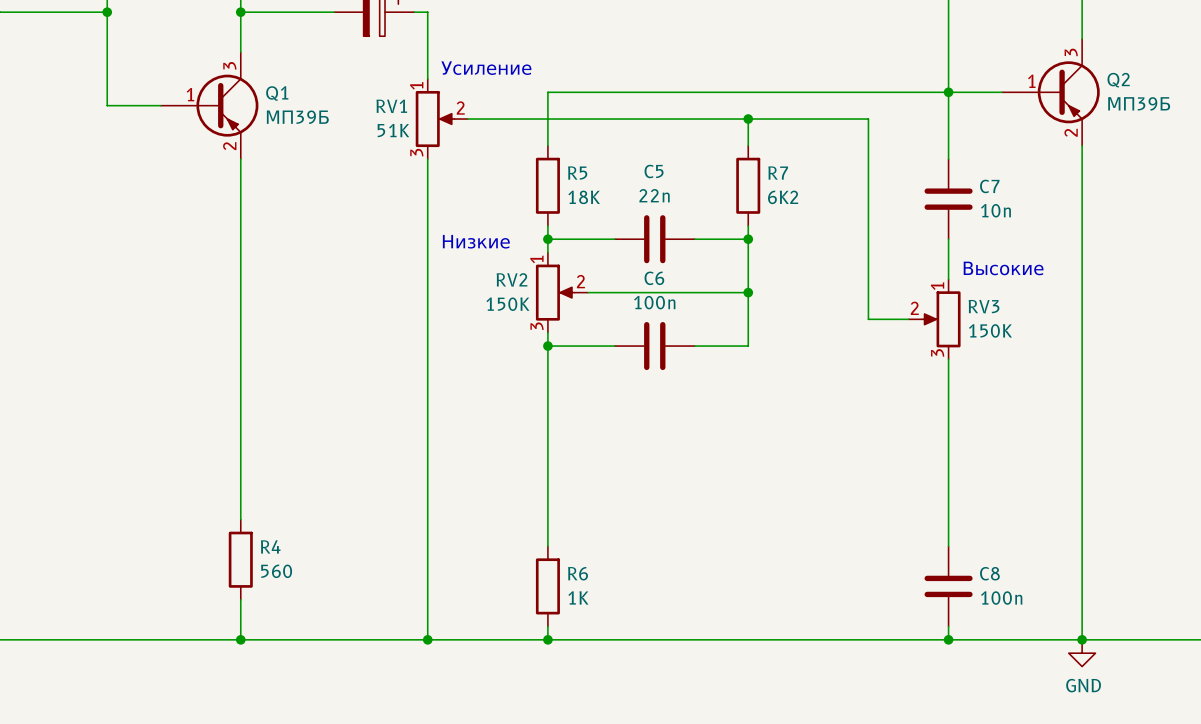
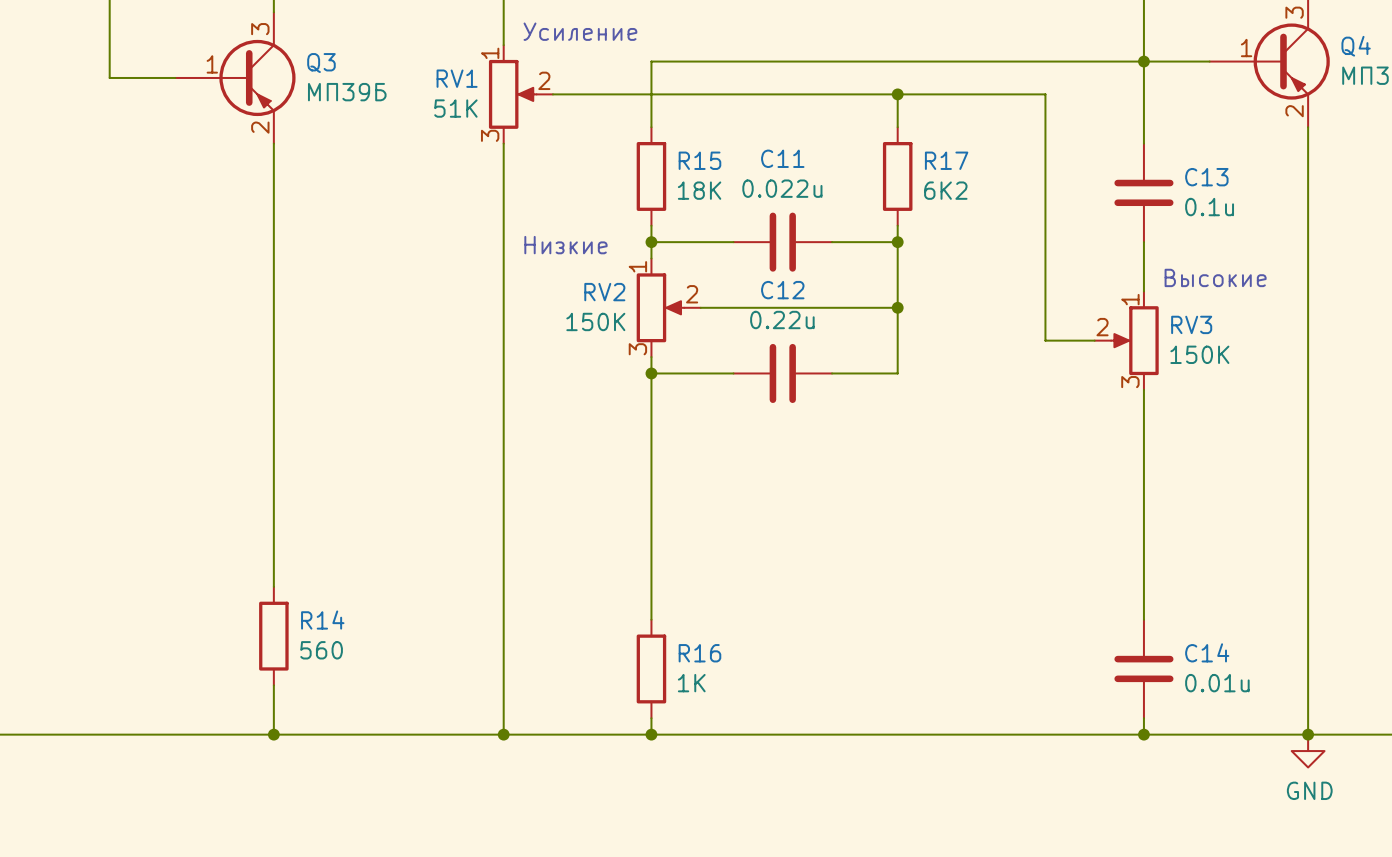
Q2 name: Q2 (1118, 80) -> Q4 (1356, 46)
Q1 name: Q1 (277, 93) -> Q3 (321, 63)
C5 name: C5 (654, 171) -> C11 (782, 158)
R5 name: R5 (577, 173) -> R15 (699, 160)
R7 name: R7 (778, 173) -> R17 (946, 160)
C7 name: C7 (989, 186) -> C13 (1206, 177)
C5 value: 22n (654, 195) -> 0.022u (782, 188)
C7 value: 10n (995, 210) -> 0.1u (1209, 207)
C6 name: C6 (654, 278) -> C12 (782, 290)
C6 value: 100n (654, 302) -> 0.22u (782, 319)
R4 name: R4 (270, 546) -> R14 (322, 620)
R6 name: R6 (577, 573) -> R16 (699, 653)
C8 name: C8 (989, 573) -> C14 (1207, 652)
C8 value: 100n (1001, 598) -> 0.01u (1217, 683)

